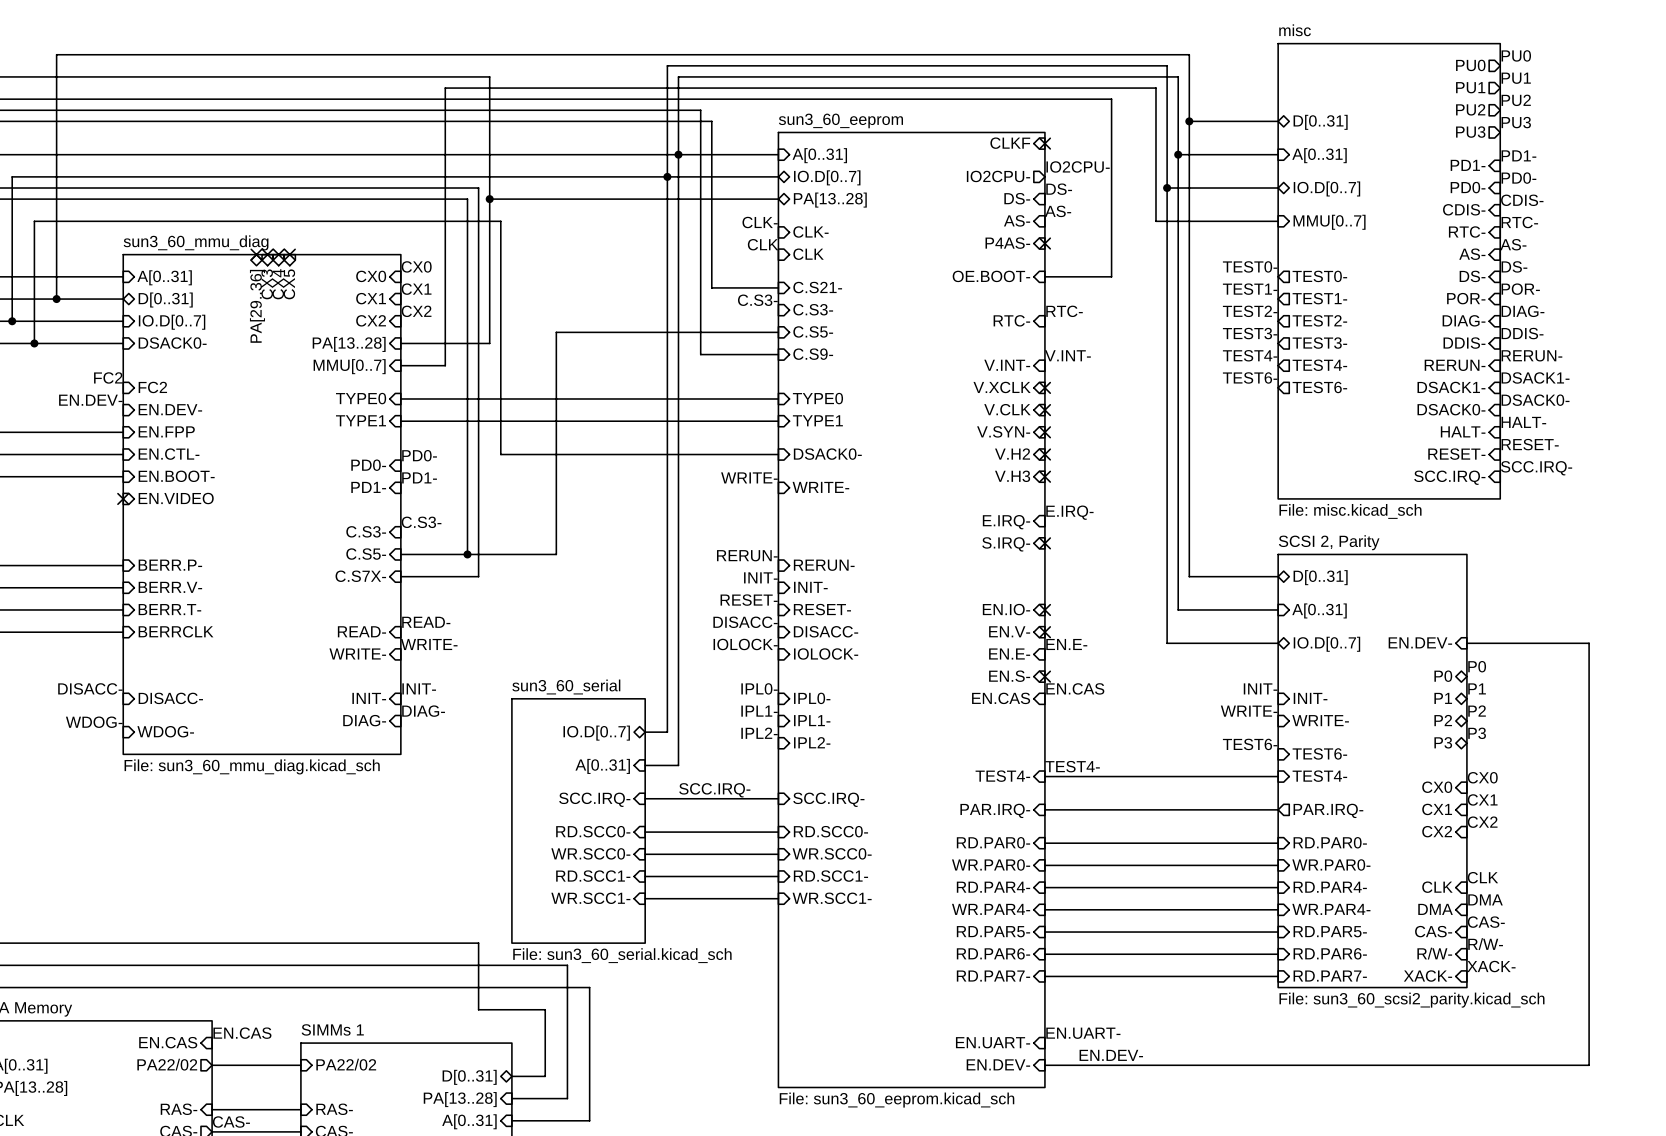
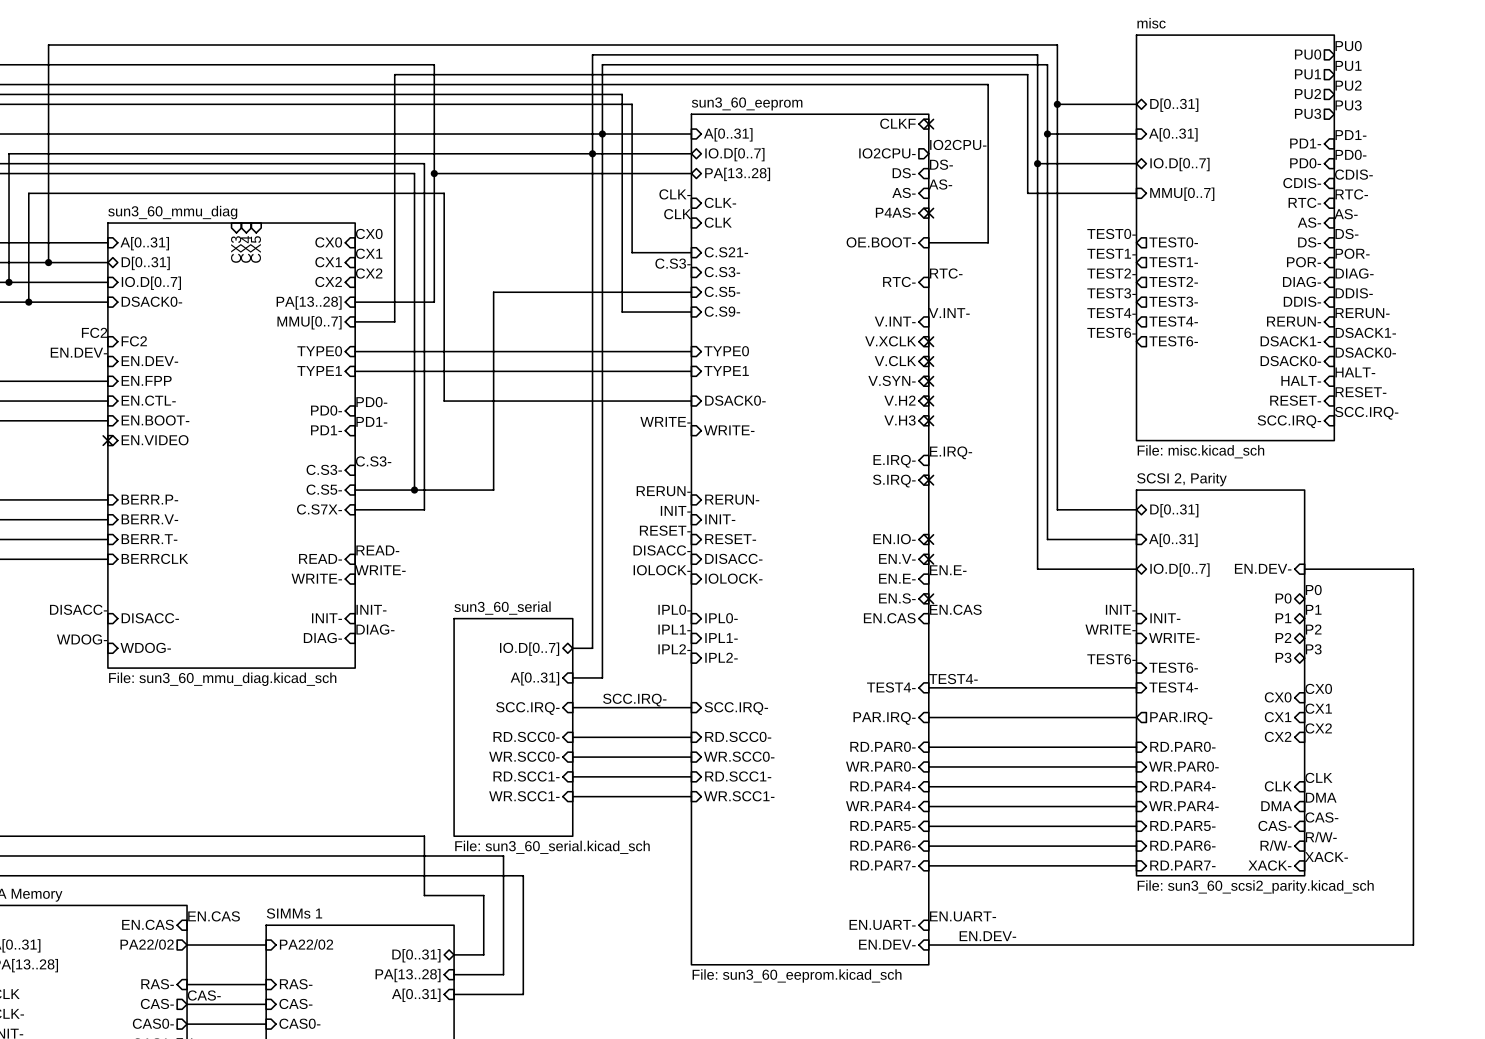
no-connect mark: (256, 254) -> none
no-connect mark: (267, 254) -> none
no-connect mark: (278, 254) -> none
no-connect mark: (289, 254) -> none
sheet pin: PA[29..36] (257, 306) -> none

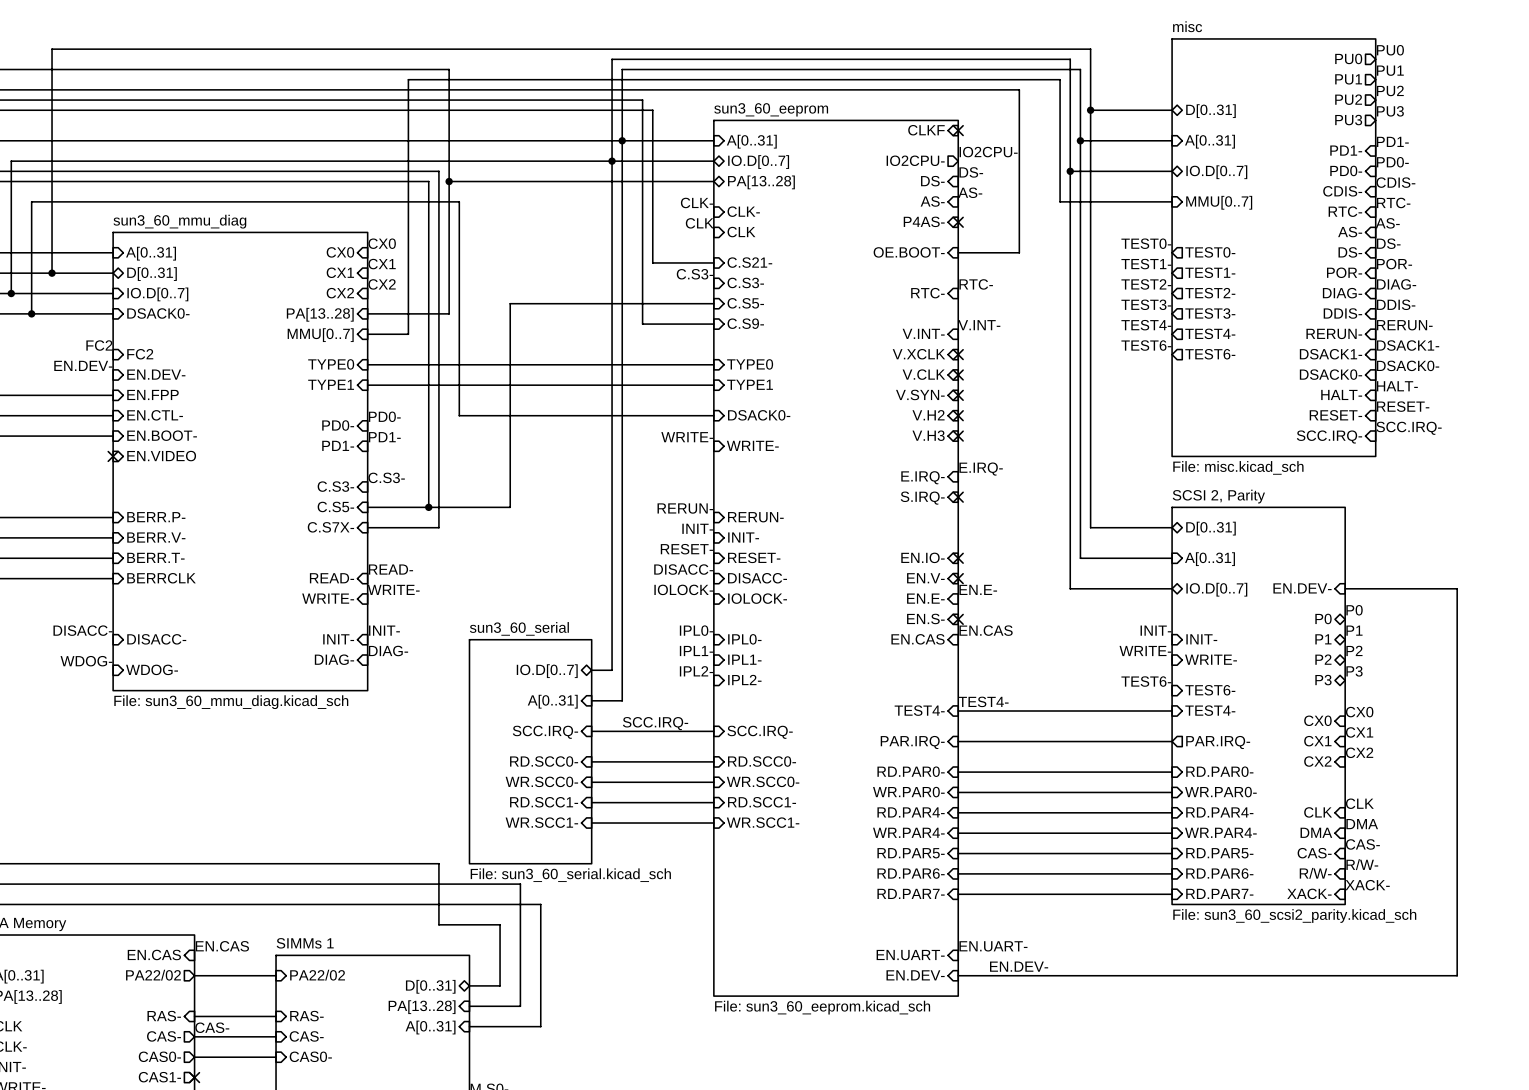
sheet pin: CX3 (236, 249) -> none
sheet pin: CX4 (246, 249) -> none
sheet pin: CX5 (255, 249) -> none

